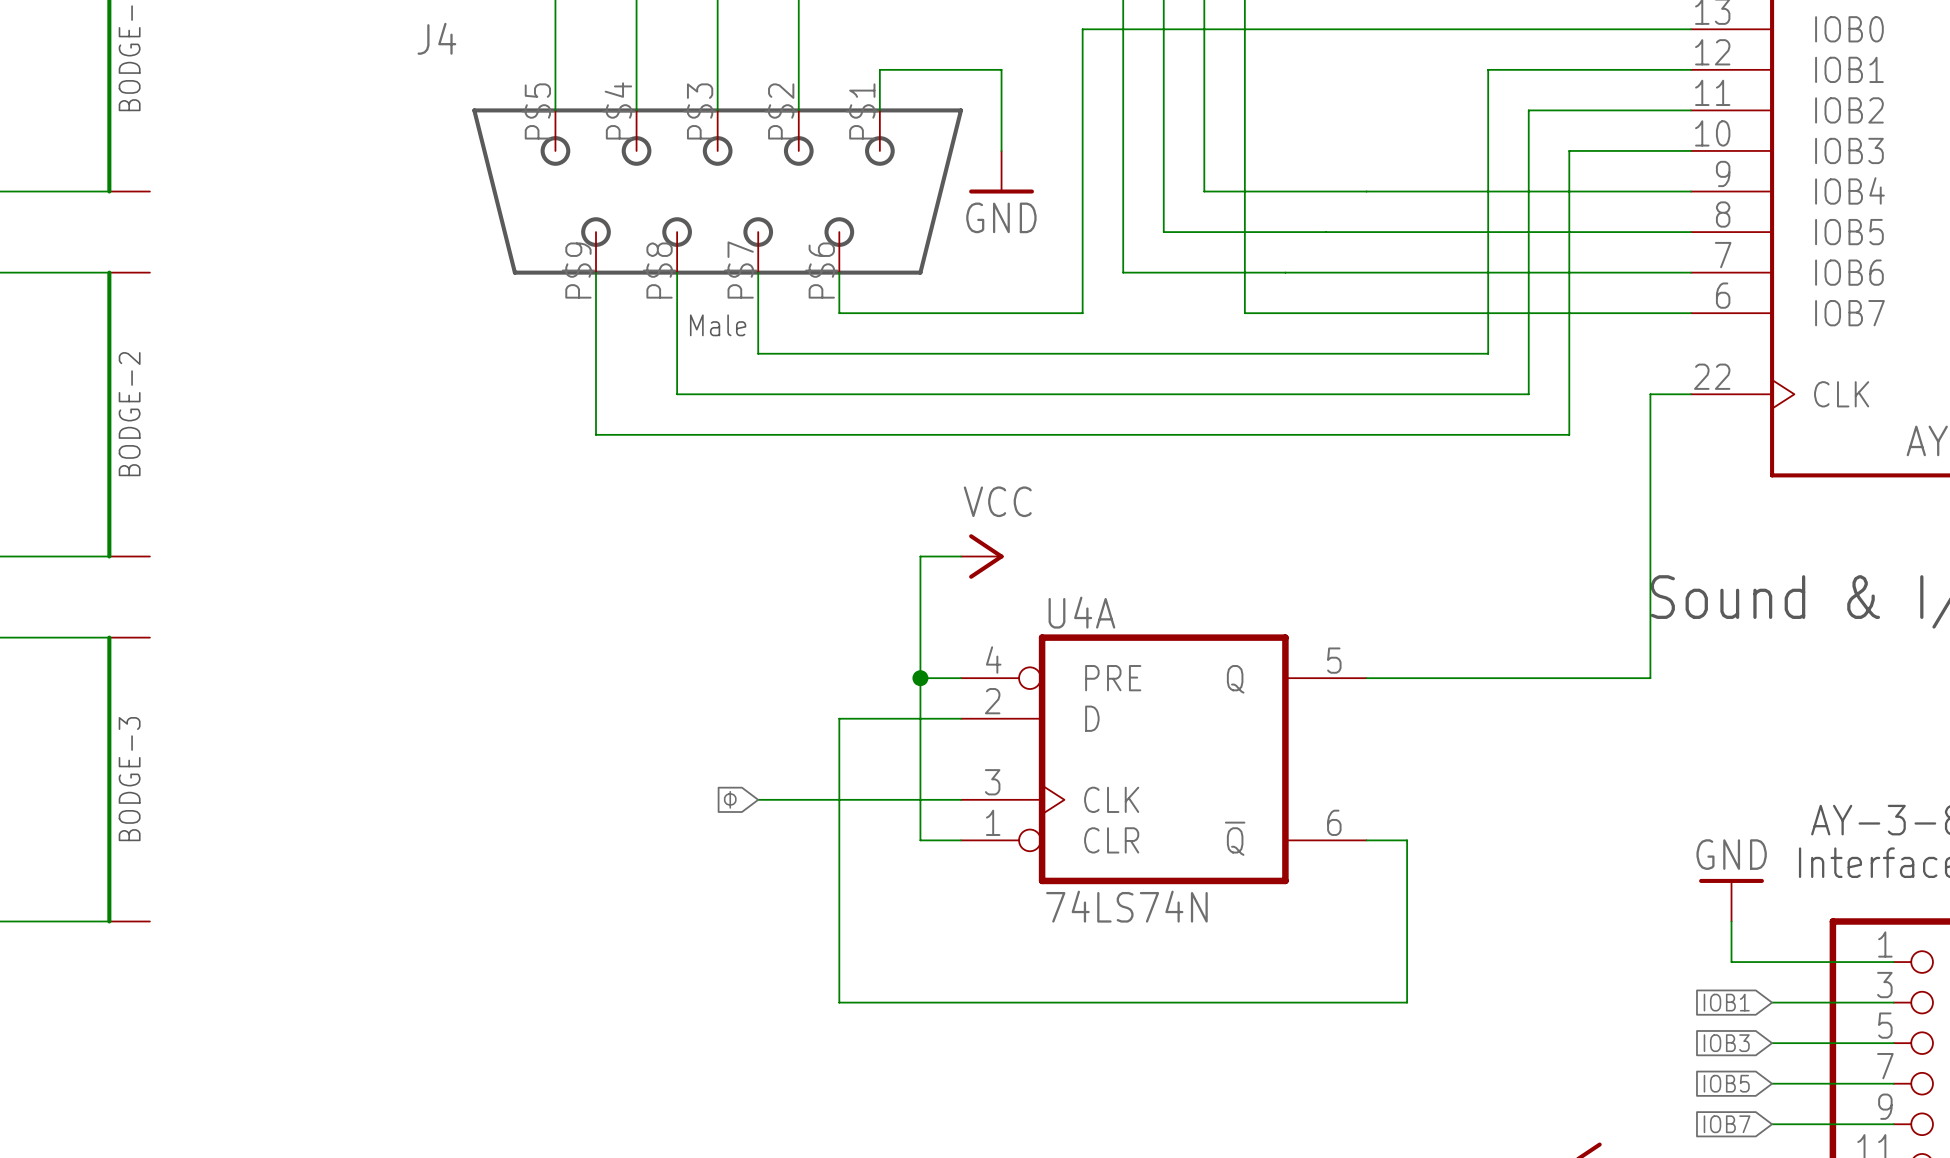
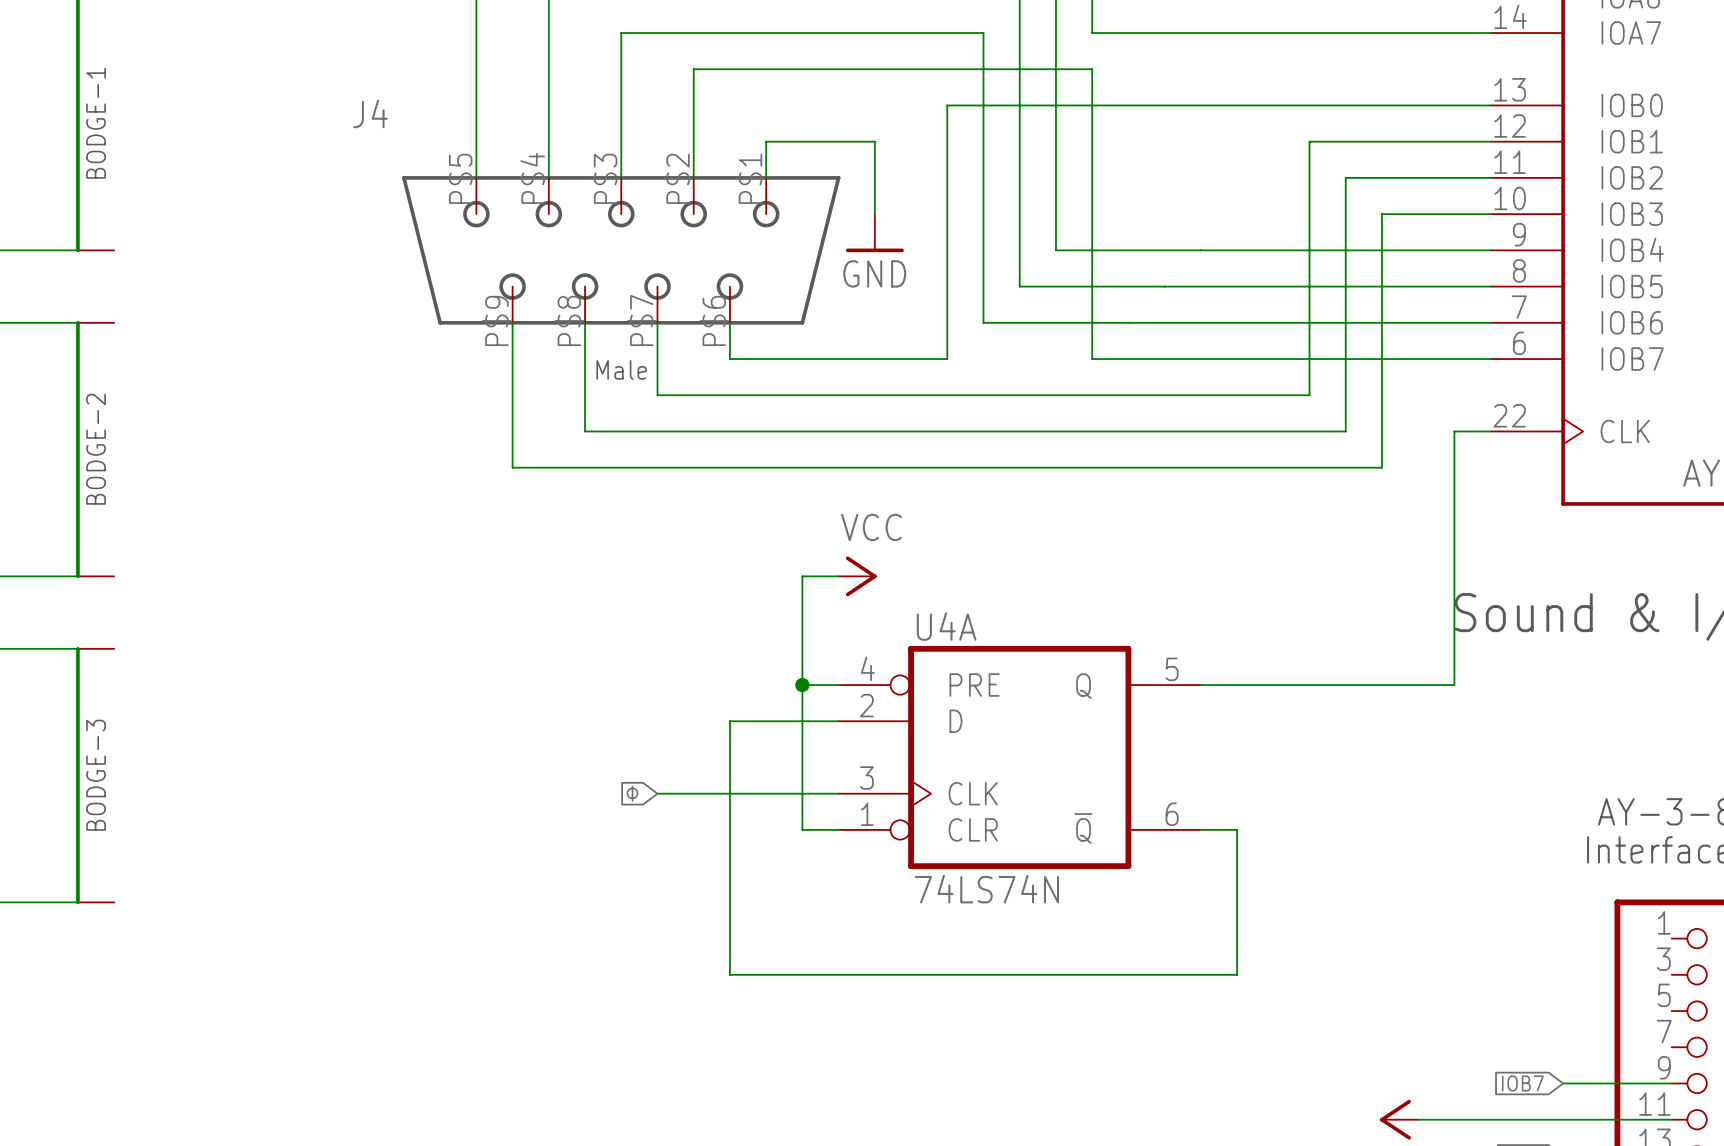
power symbol: GND (1731, 900) -> none
wire: (1731, 921) (1731, 962) (1893, 962) -> none
global label: IOB1 (1726, 1002) -> none
wire: (1772, 1002) (1893, 1002) -> none
global label: IOB3 (1726, 1043) -> none
wire: (1772, 1043) (1893, 1043) -> none
global label: IOB5 (1726, 1083) -> none
wire: (1772, 1083) (1893, 1083) -> none

